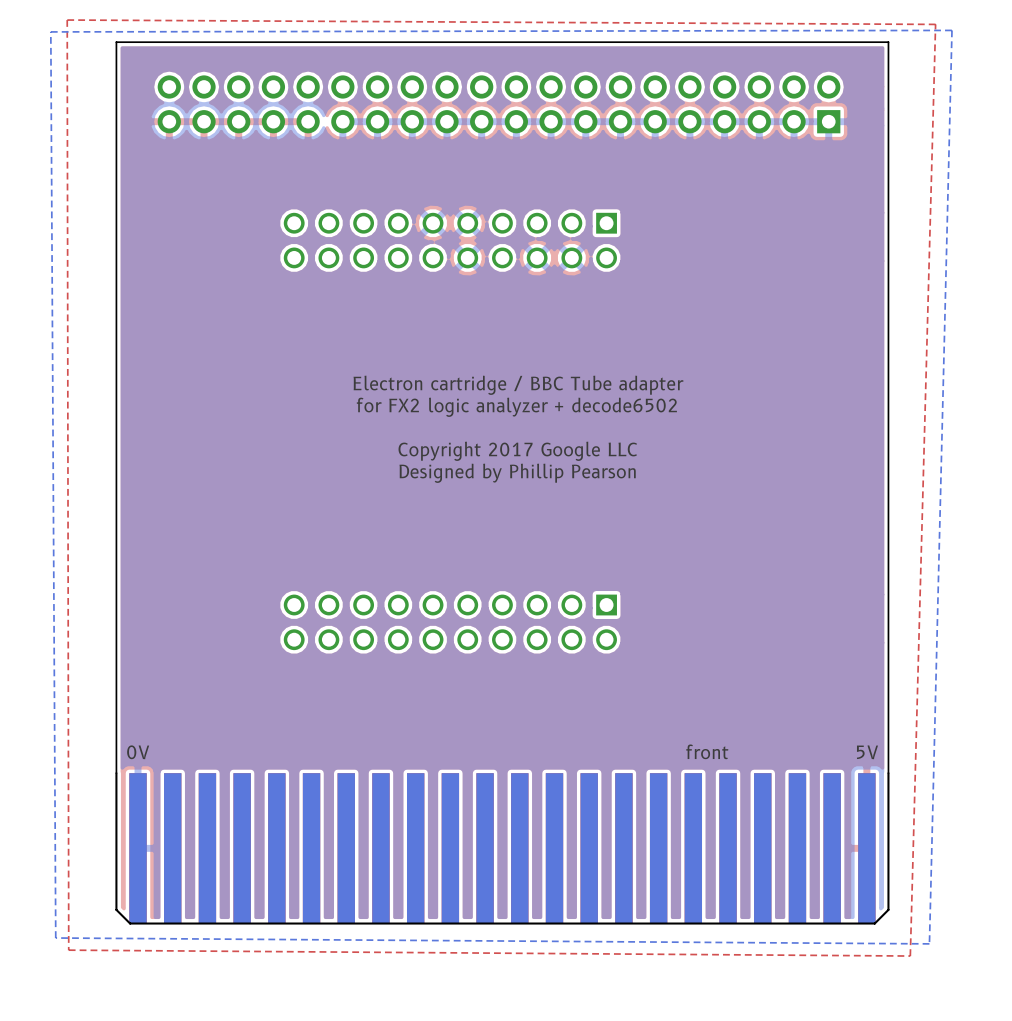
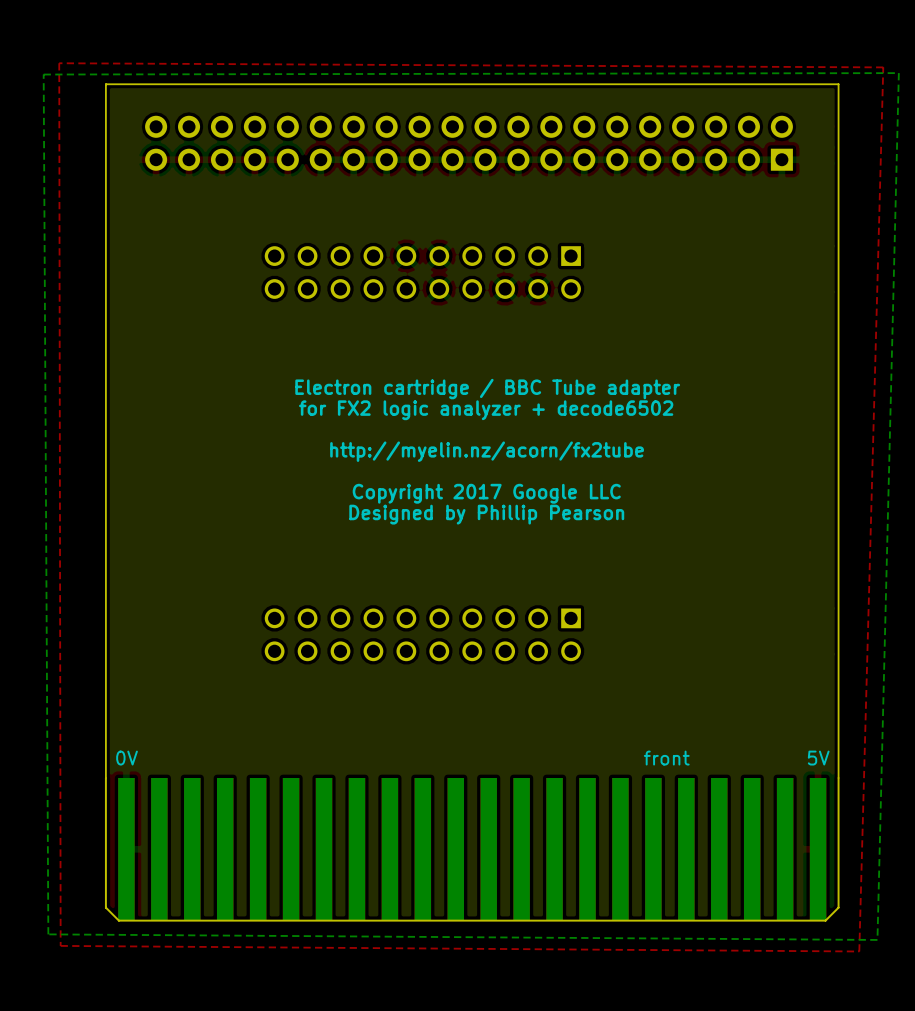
text: none -> Electron cartridge / BBC Tube adapter (487, 389)
text: Electron cartridge / BBC Tube adapter (518, 385) -> for FX2 logic analyzer + decode6502 (486, 410)
text: for FX2 logic analyzer + decode6502 (516, 407) -> none
text: none -> http://myelin.nz/acorn/fx2tube (487, 451)
text: Copyright 2017 Google LLC (517, 451) -> none
text: Designed by Phillip Pearson (517, 473) -> Copyright 2017 Google LLC (486, 493)
text: none -> Designed by Phillip Pearson (486, 514)

